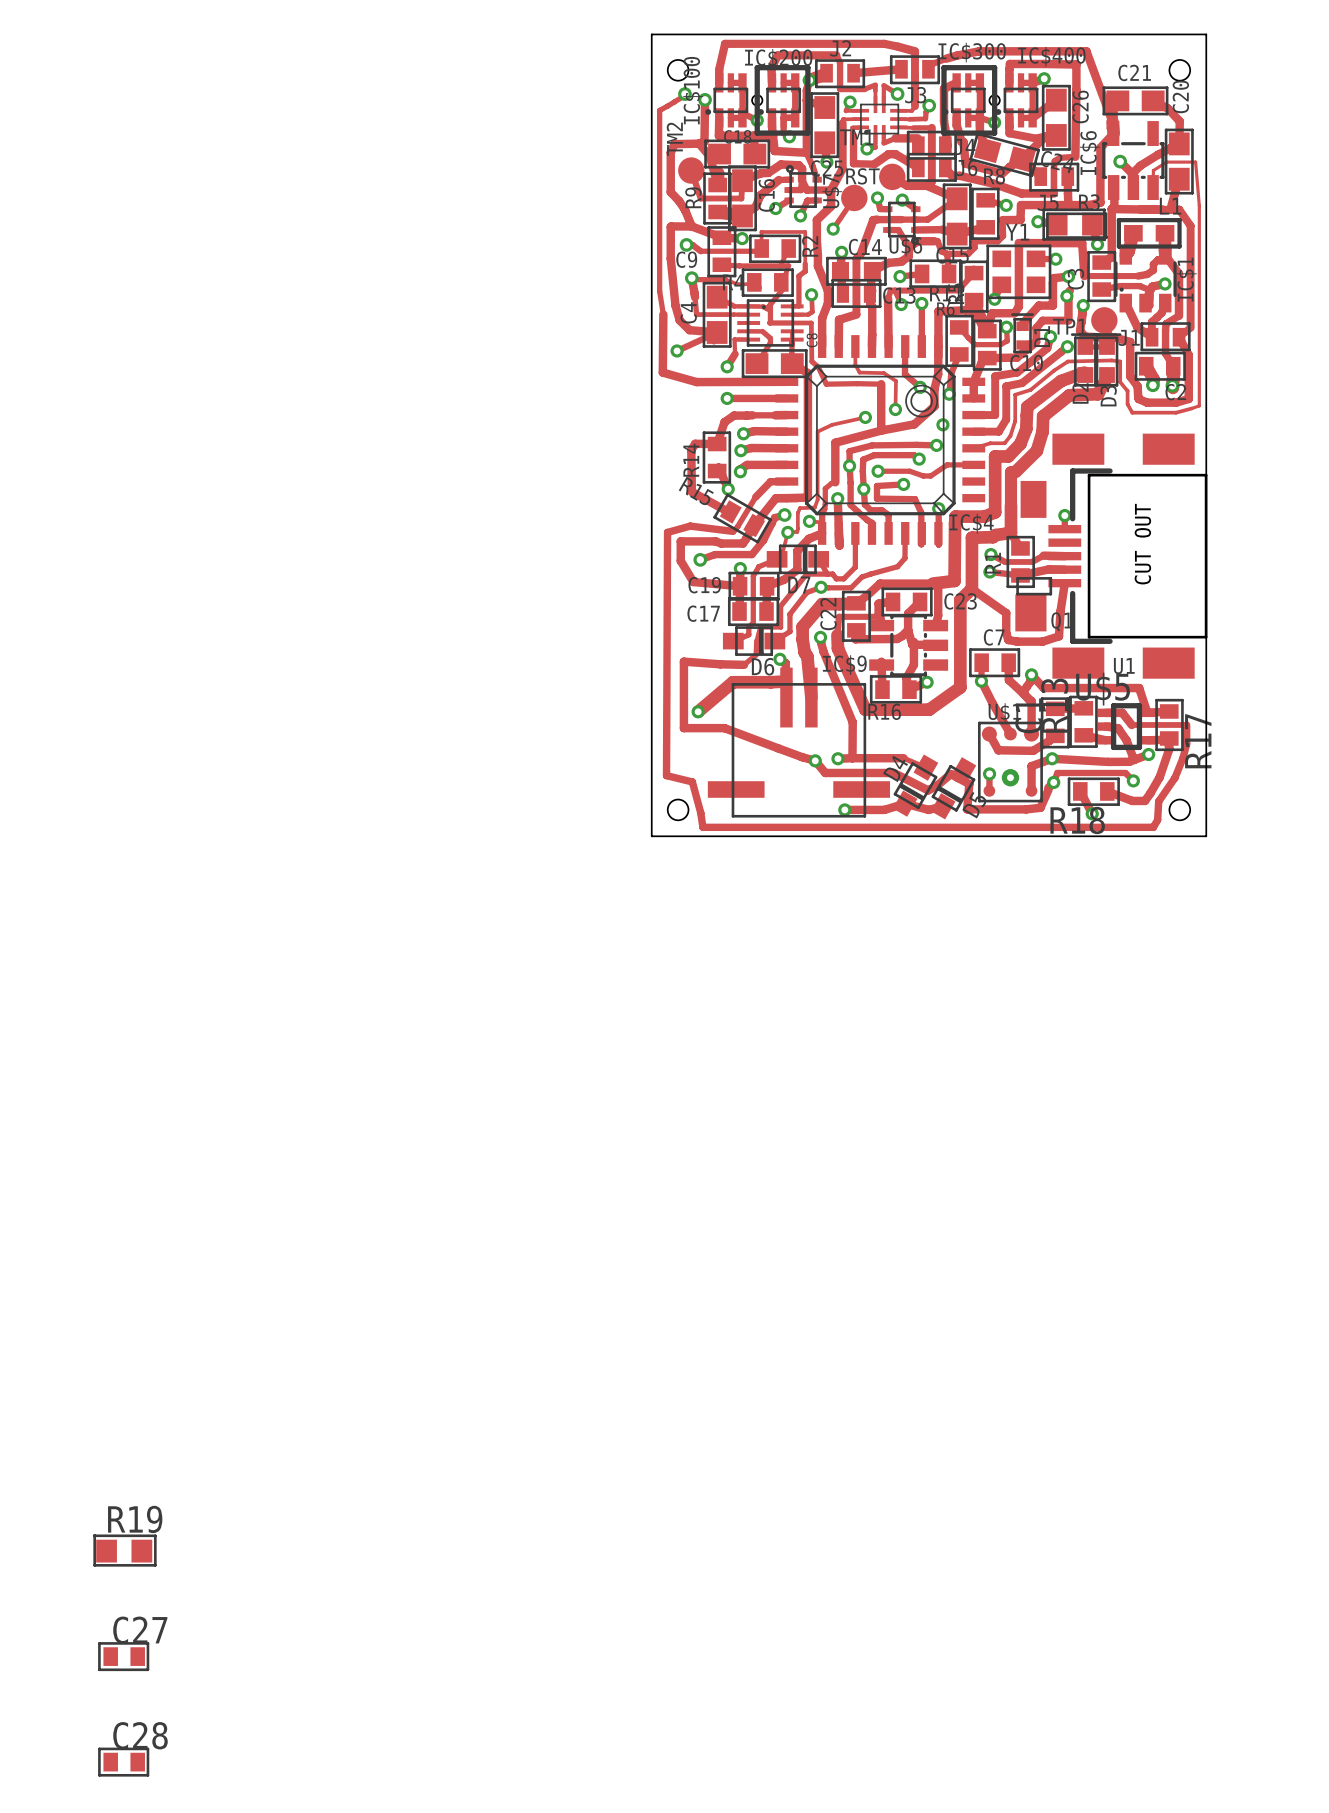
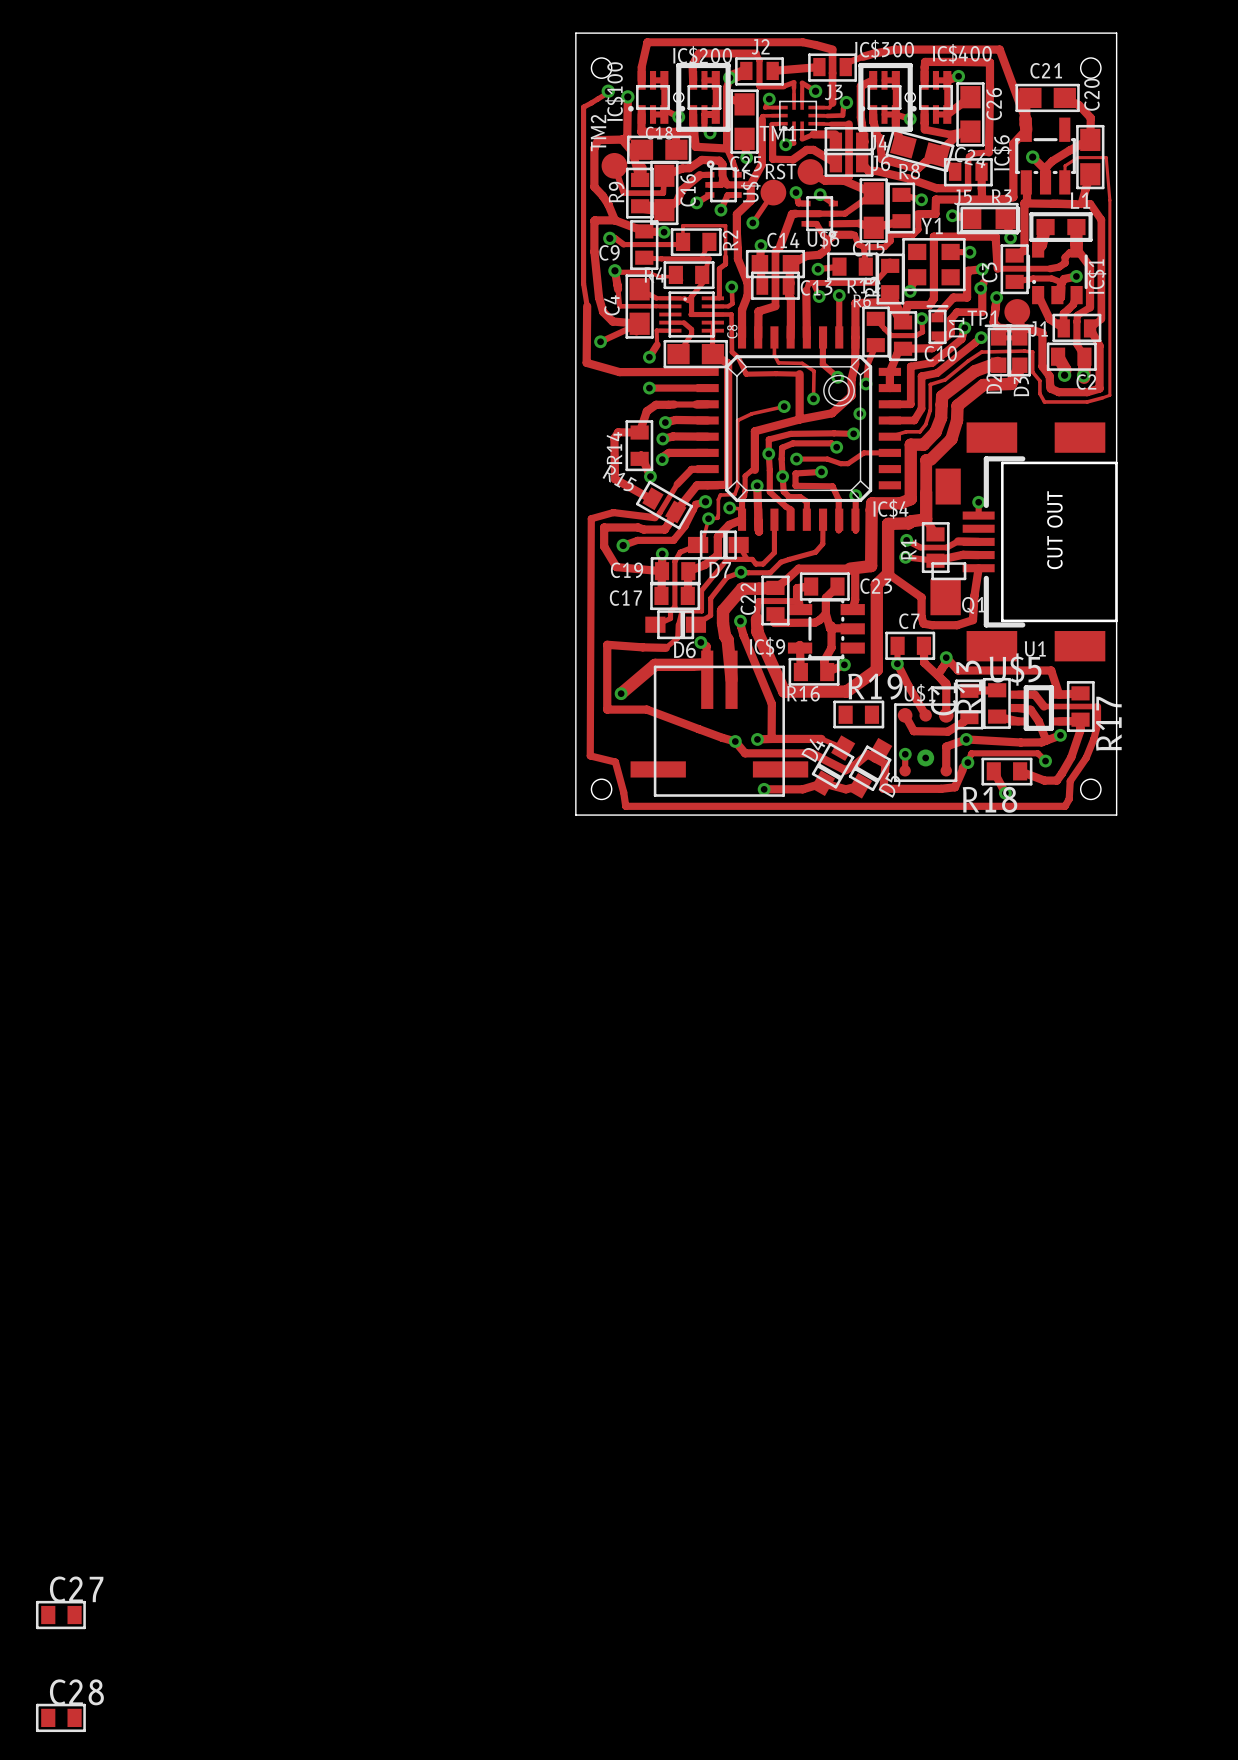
R19 footprint: [92, 1533, 157, 1567] -> [833, 700, 885, 729]

